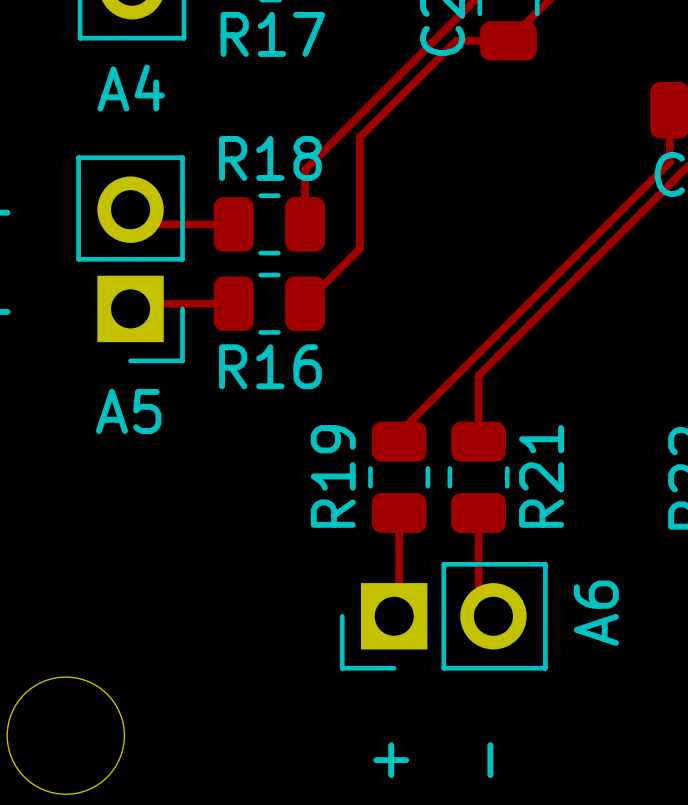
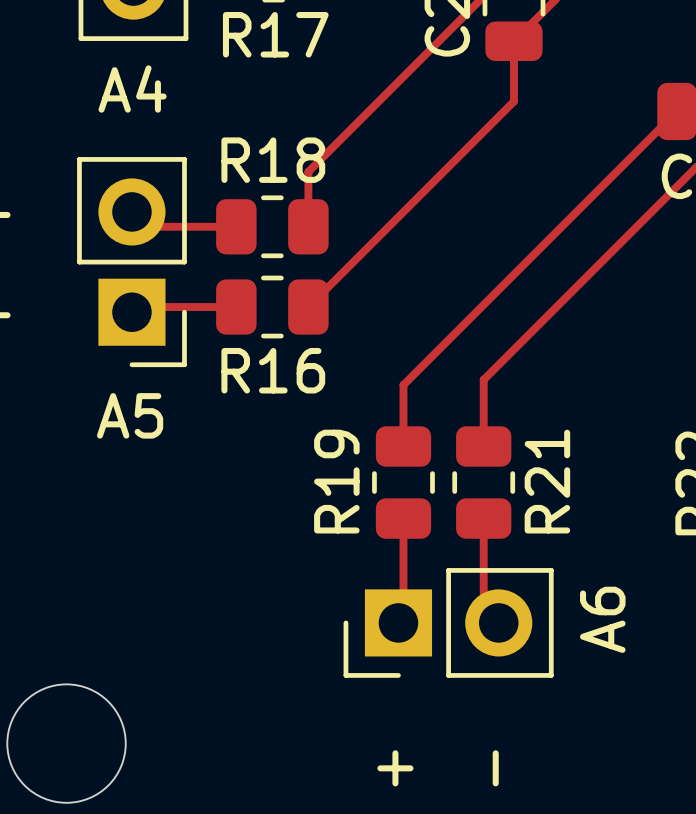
track: (508, 40) (456, 40) (359, 137) (359, 249) -> (513, 41) (513, 101) (363, 251)
track: (669, 110) (669, 162) (399, 433) -> (677, 111) (403, 385) (403, 437)

